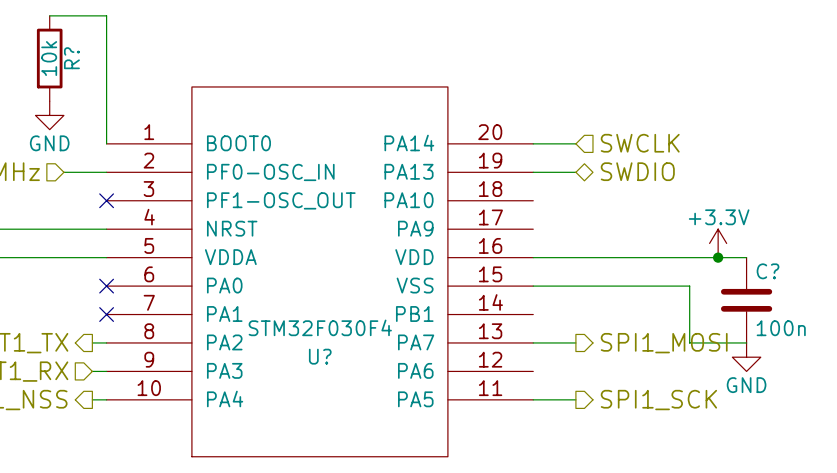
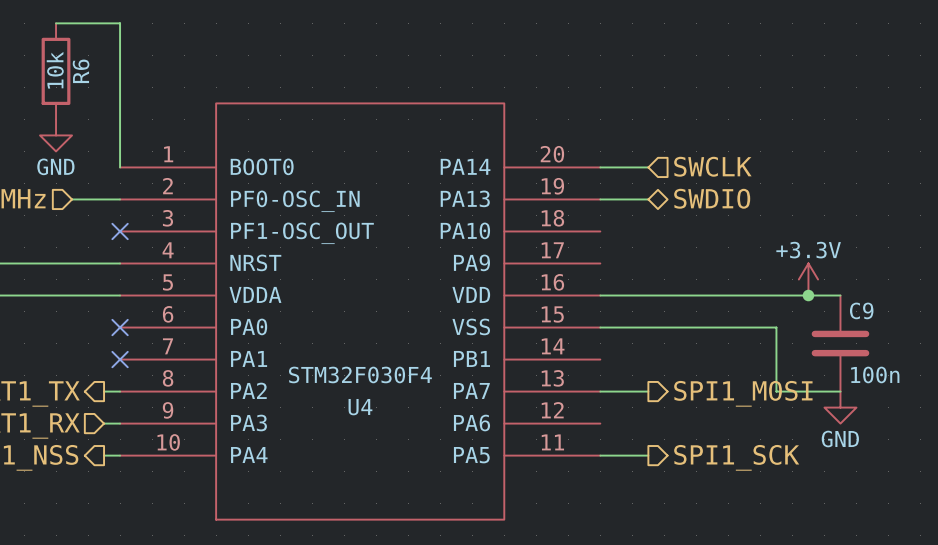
R? name: R? (71, 58) -> R6 (81, 71)
C? name: C? (768, 271) -> C9 (861, 310)
U? name: U? (320, 356) -> U4 (360, 407)

